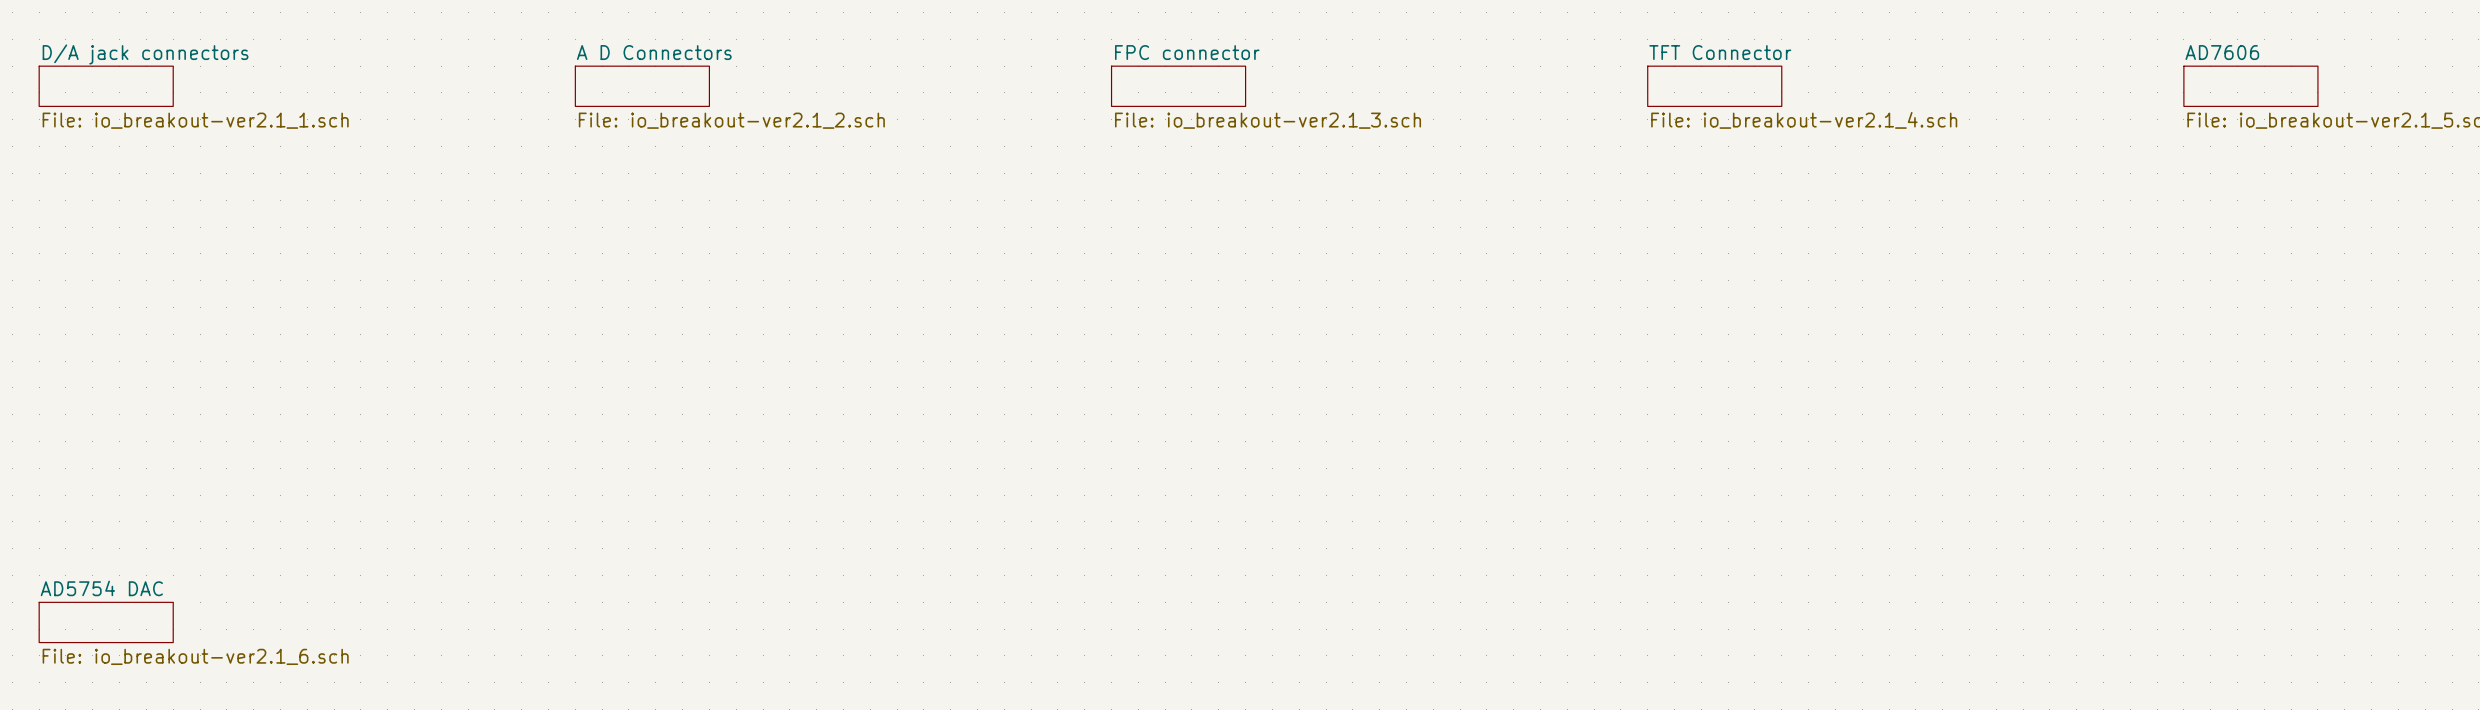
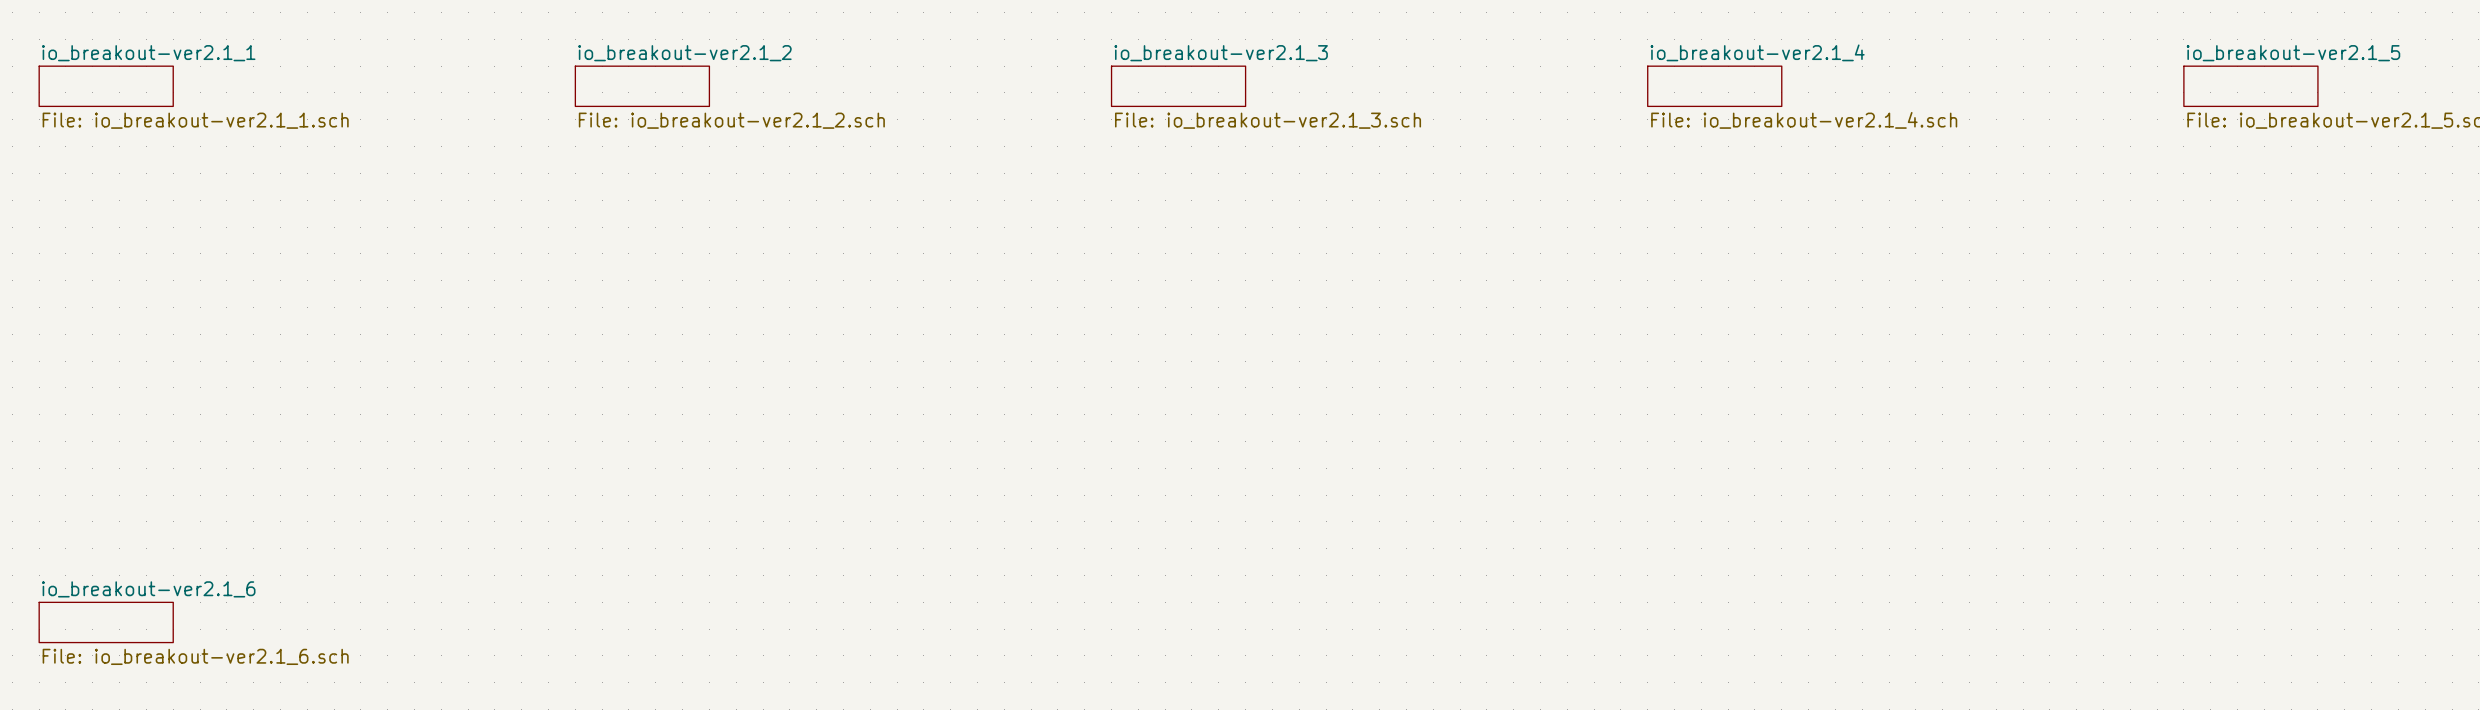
sheet A D Connectors name: A D Connectors (654, 52) -> io_breakout-ver2.1_2 (684, 53)
sheet FPC connector name: FPC connector (1187, 52) -> io_breakout-ver2.1_3 (1221, 53)
sheet TFT Connector name: TFT Connector (1720, 52) -> io_breakout-ver2.1_4 (1757, 52)
sheet AD7606 name: AD7606 (2222, 52) -> io_breakout-ver2.1_5 (2293, 53)
sheet D/A jack connectors name: D/A jack connectors (145, 54) -> io_breakout-ver2.1_1 (148, 53)
sheet AD5754 DAC name: AD5754 DAC (101, 588) -> io_breakout-ver2.1_6 (148, 589)

